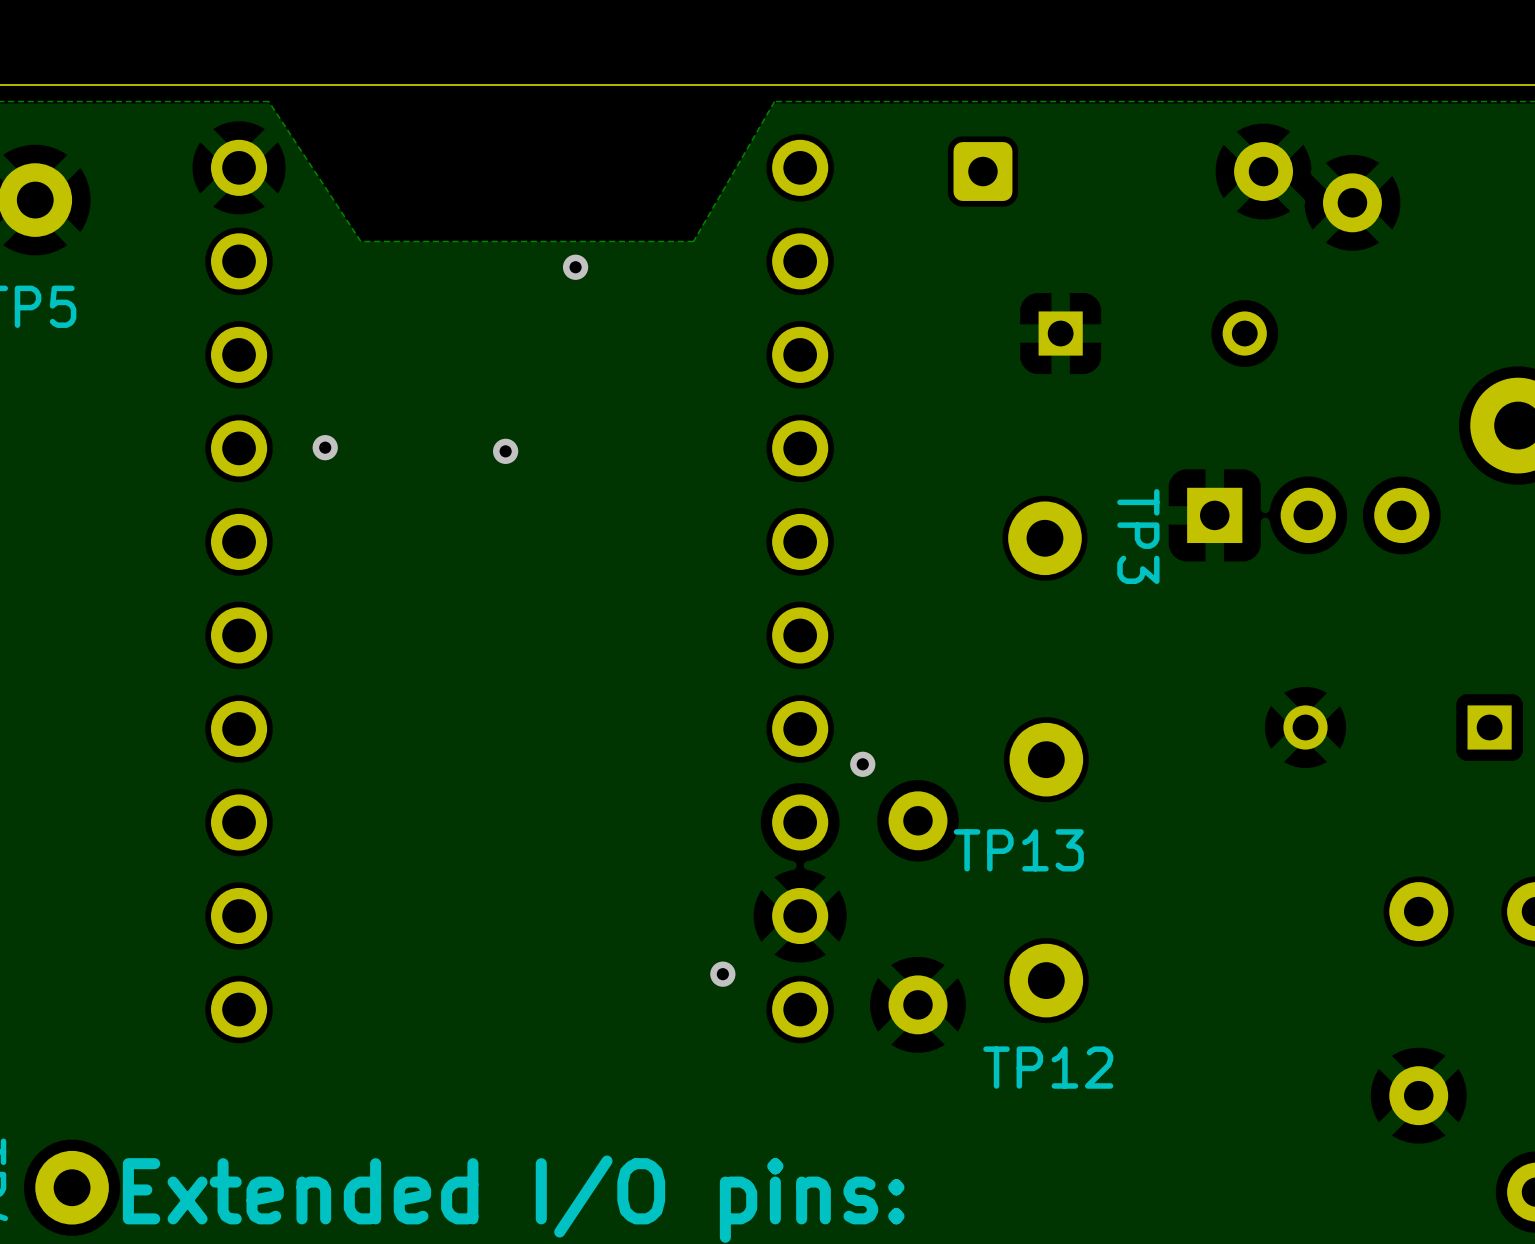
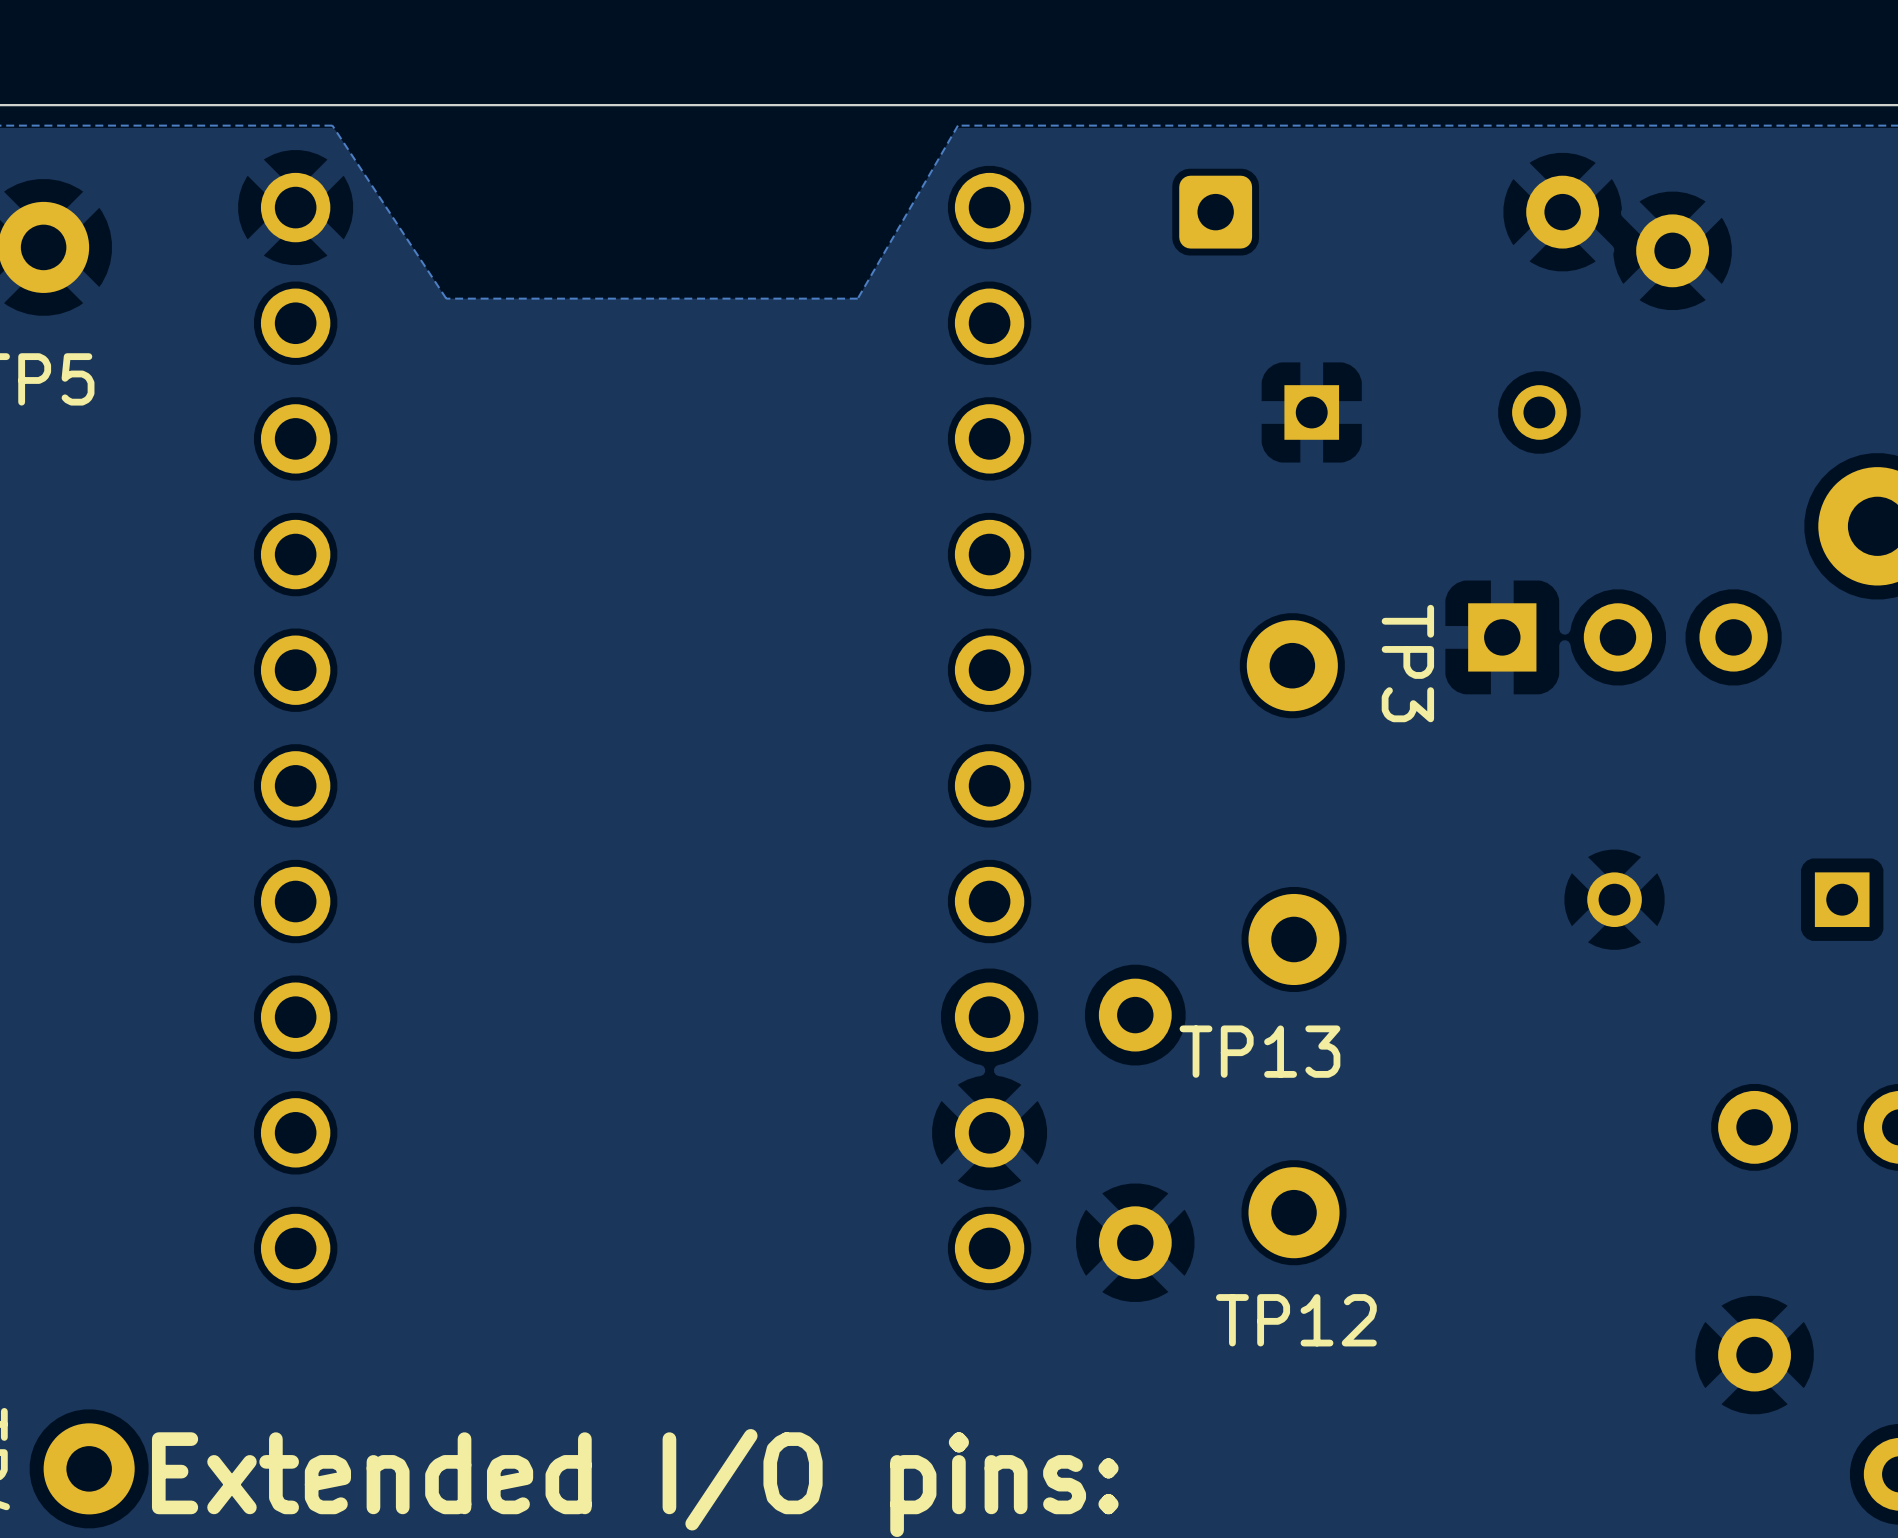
via: (575, 267) -> none
via: (325, 447) -> none
via: (505, 451) -> none
via: (862, 764) -> none
via: (722, 974) -> none

